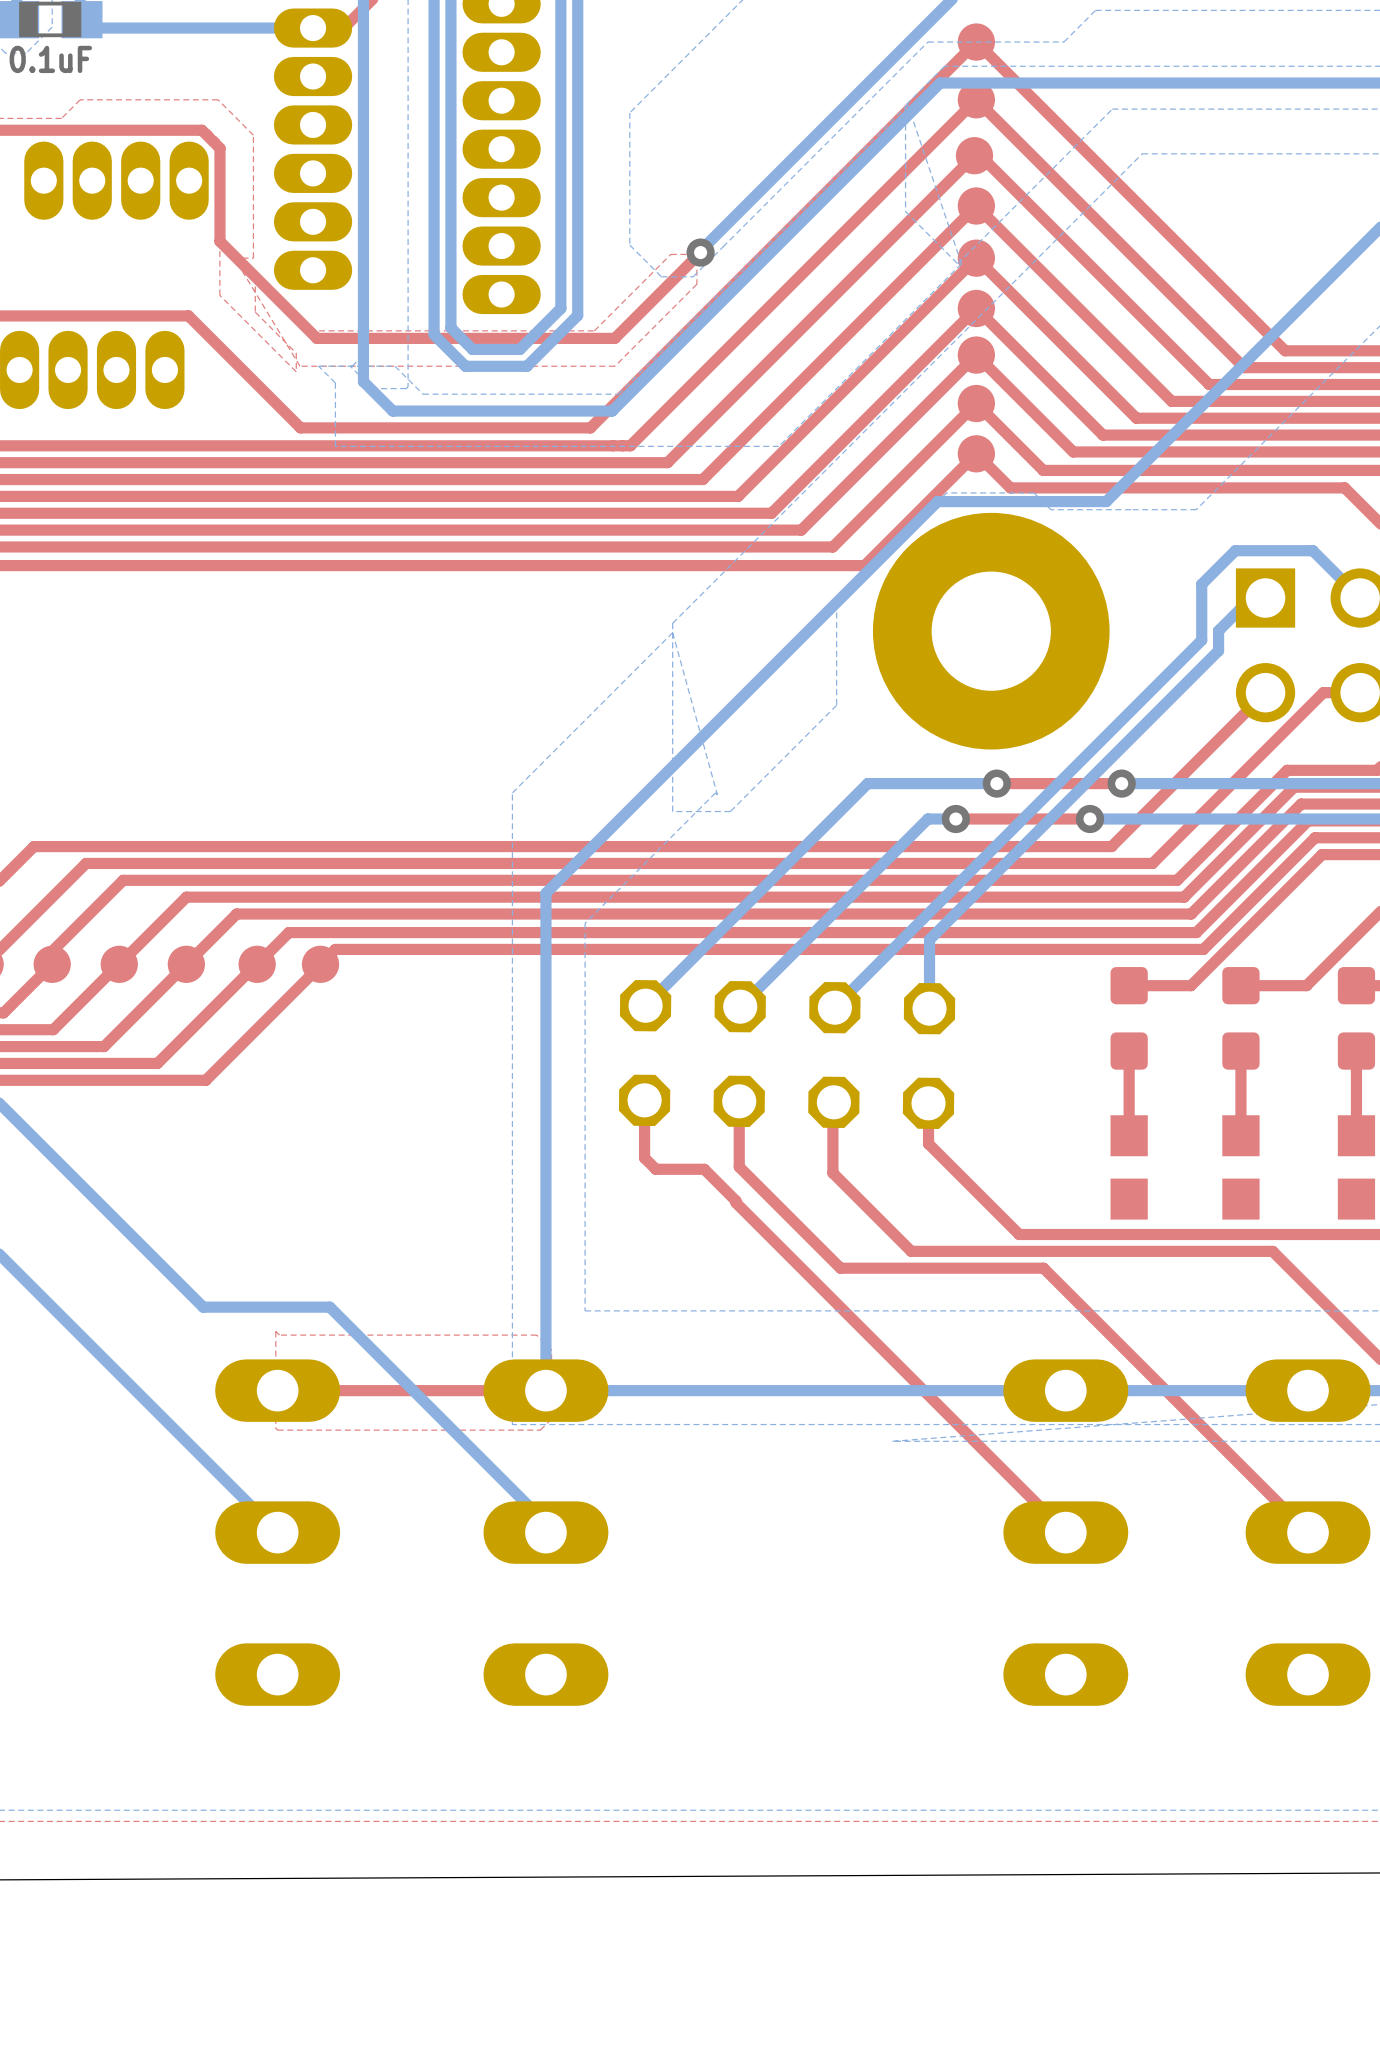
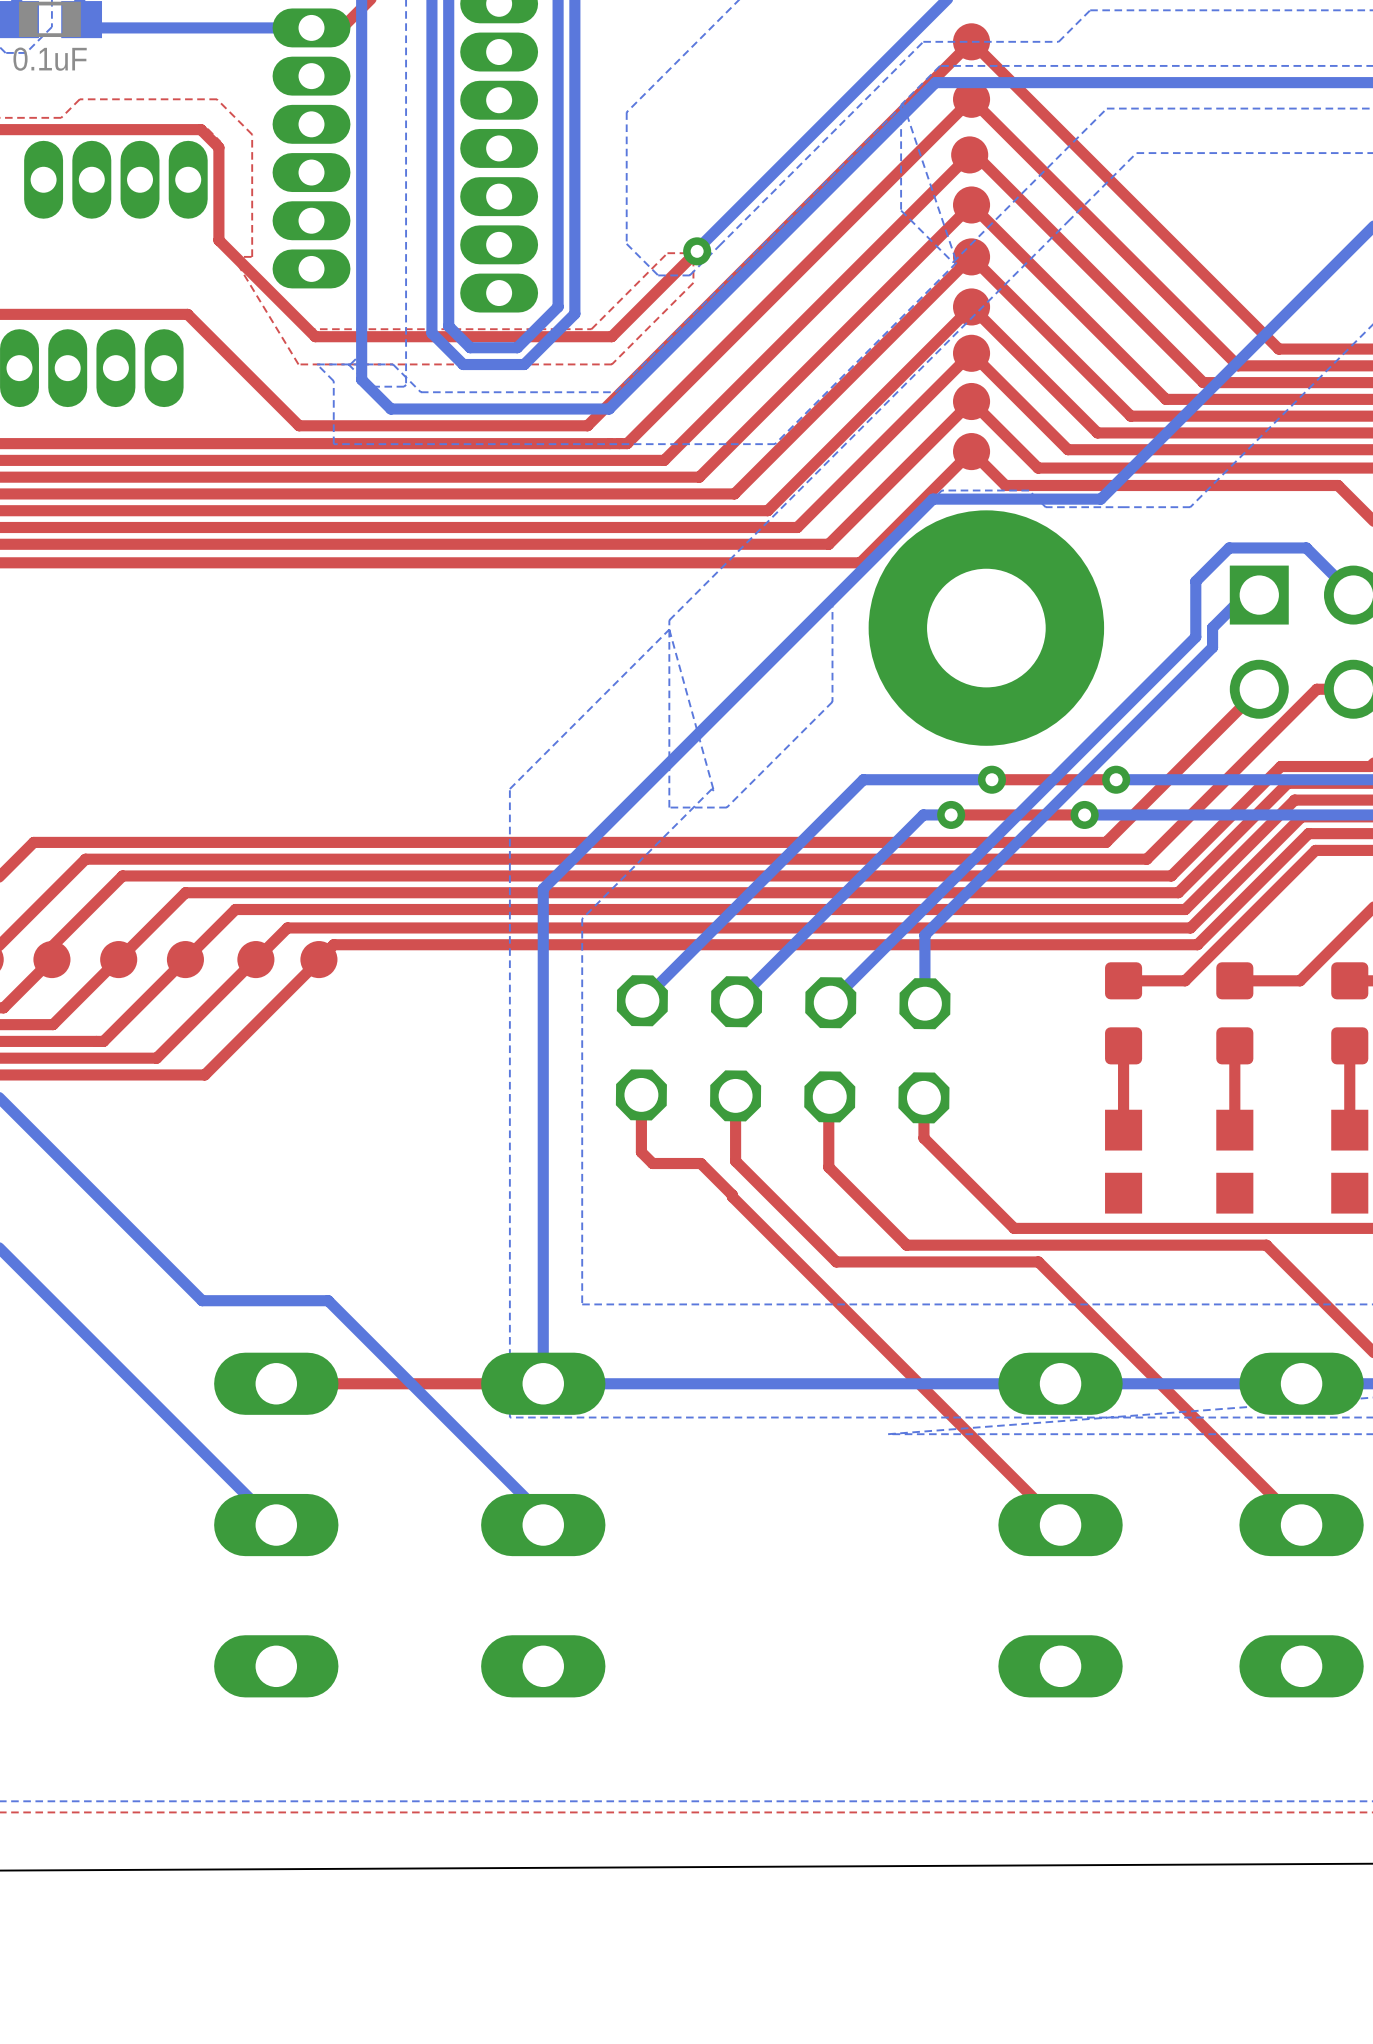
top zone outline: (231, 252) (219, 241) (219, 295) (296, 371) (296, 353) (255, 312) (255, 276) -> none
top zone outline: (275, 1331) (279, 1335) (536, 1335) (551, 1350) (549, 1420) (540, 1430) (277, 1430) (275, 1428) (275, 1331) -> none

